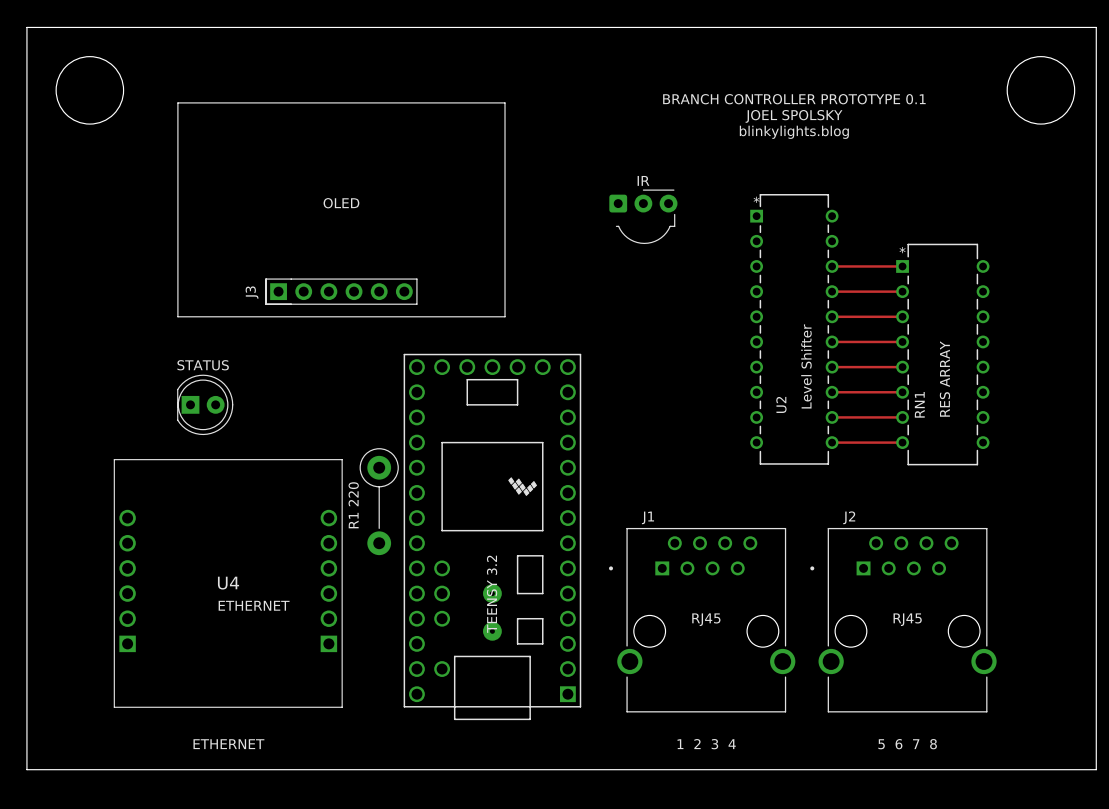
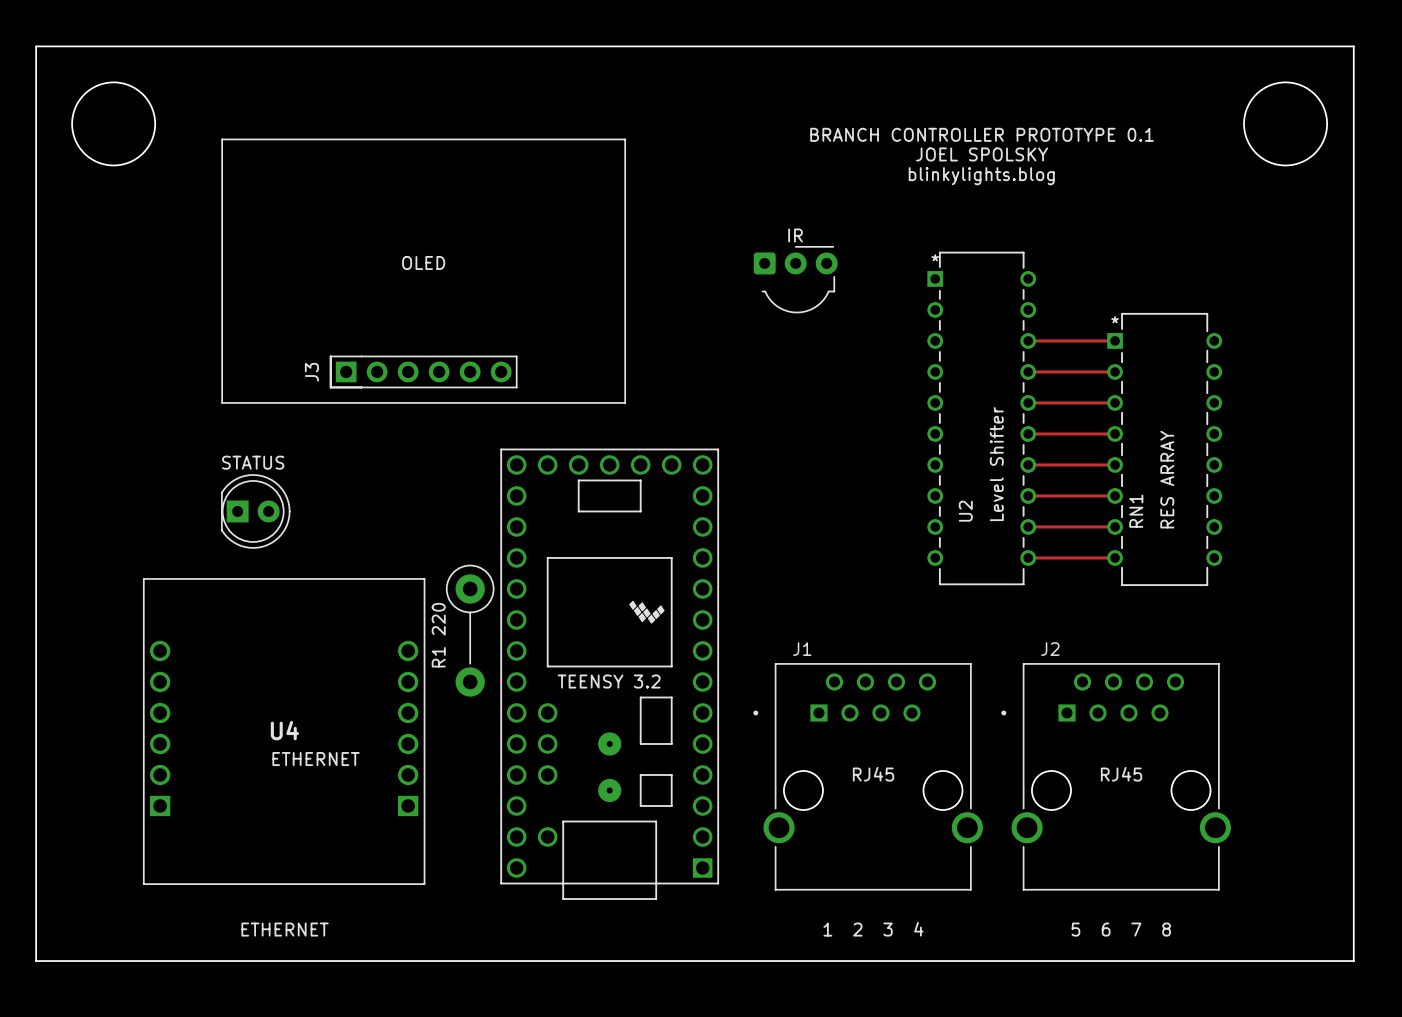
TEENSY 3.2 name rotation: 0° (492, 594) -> 90° clockwise (609, 681)

